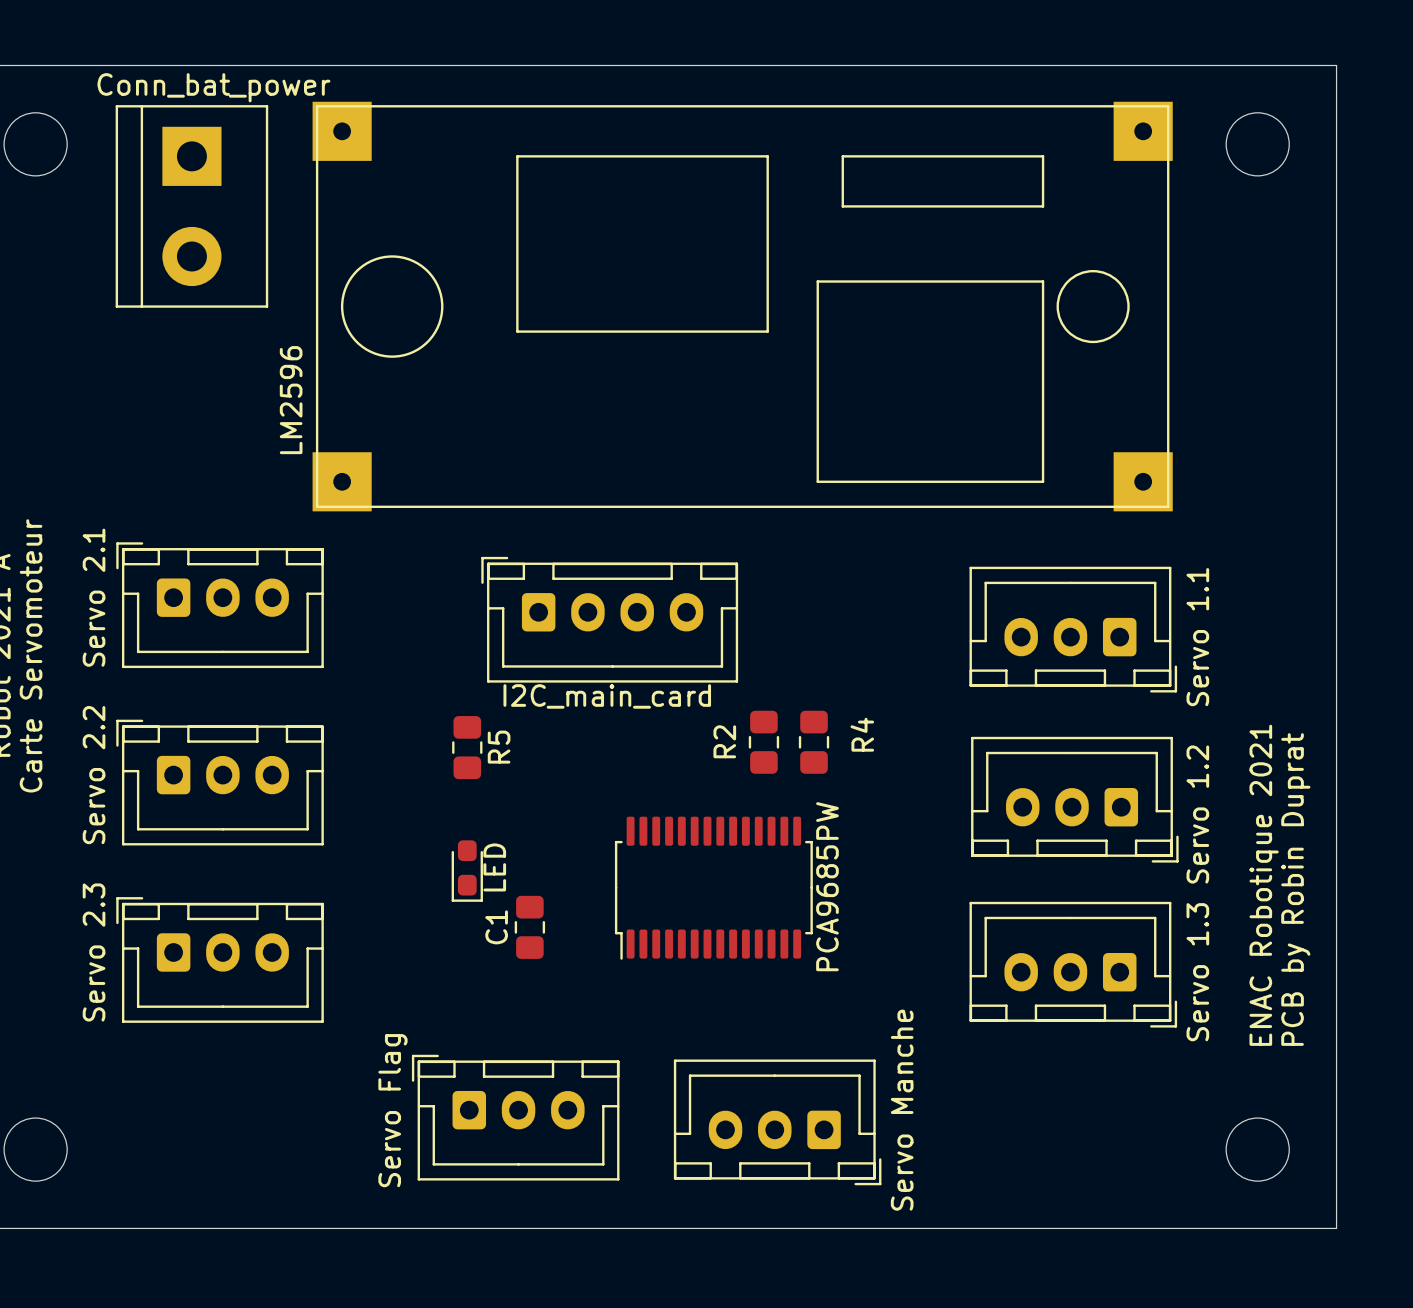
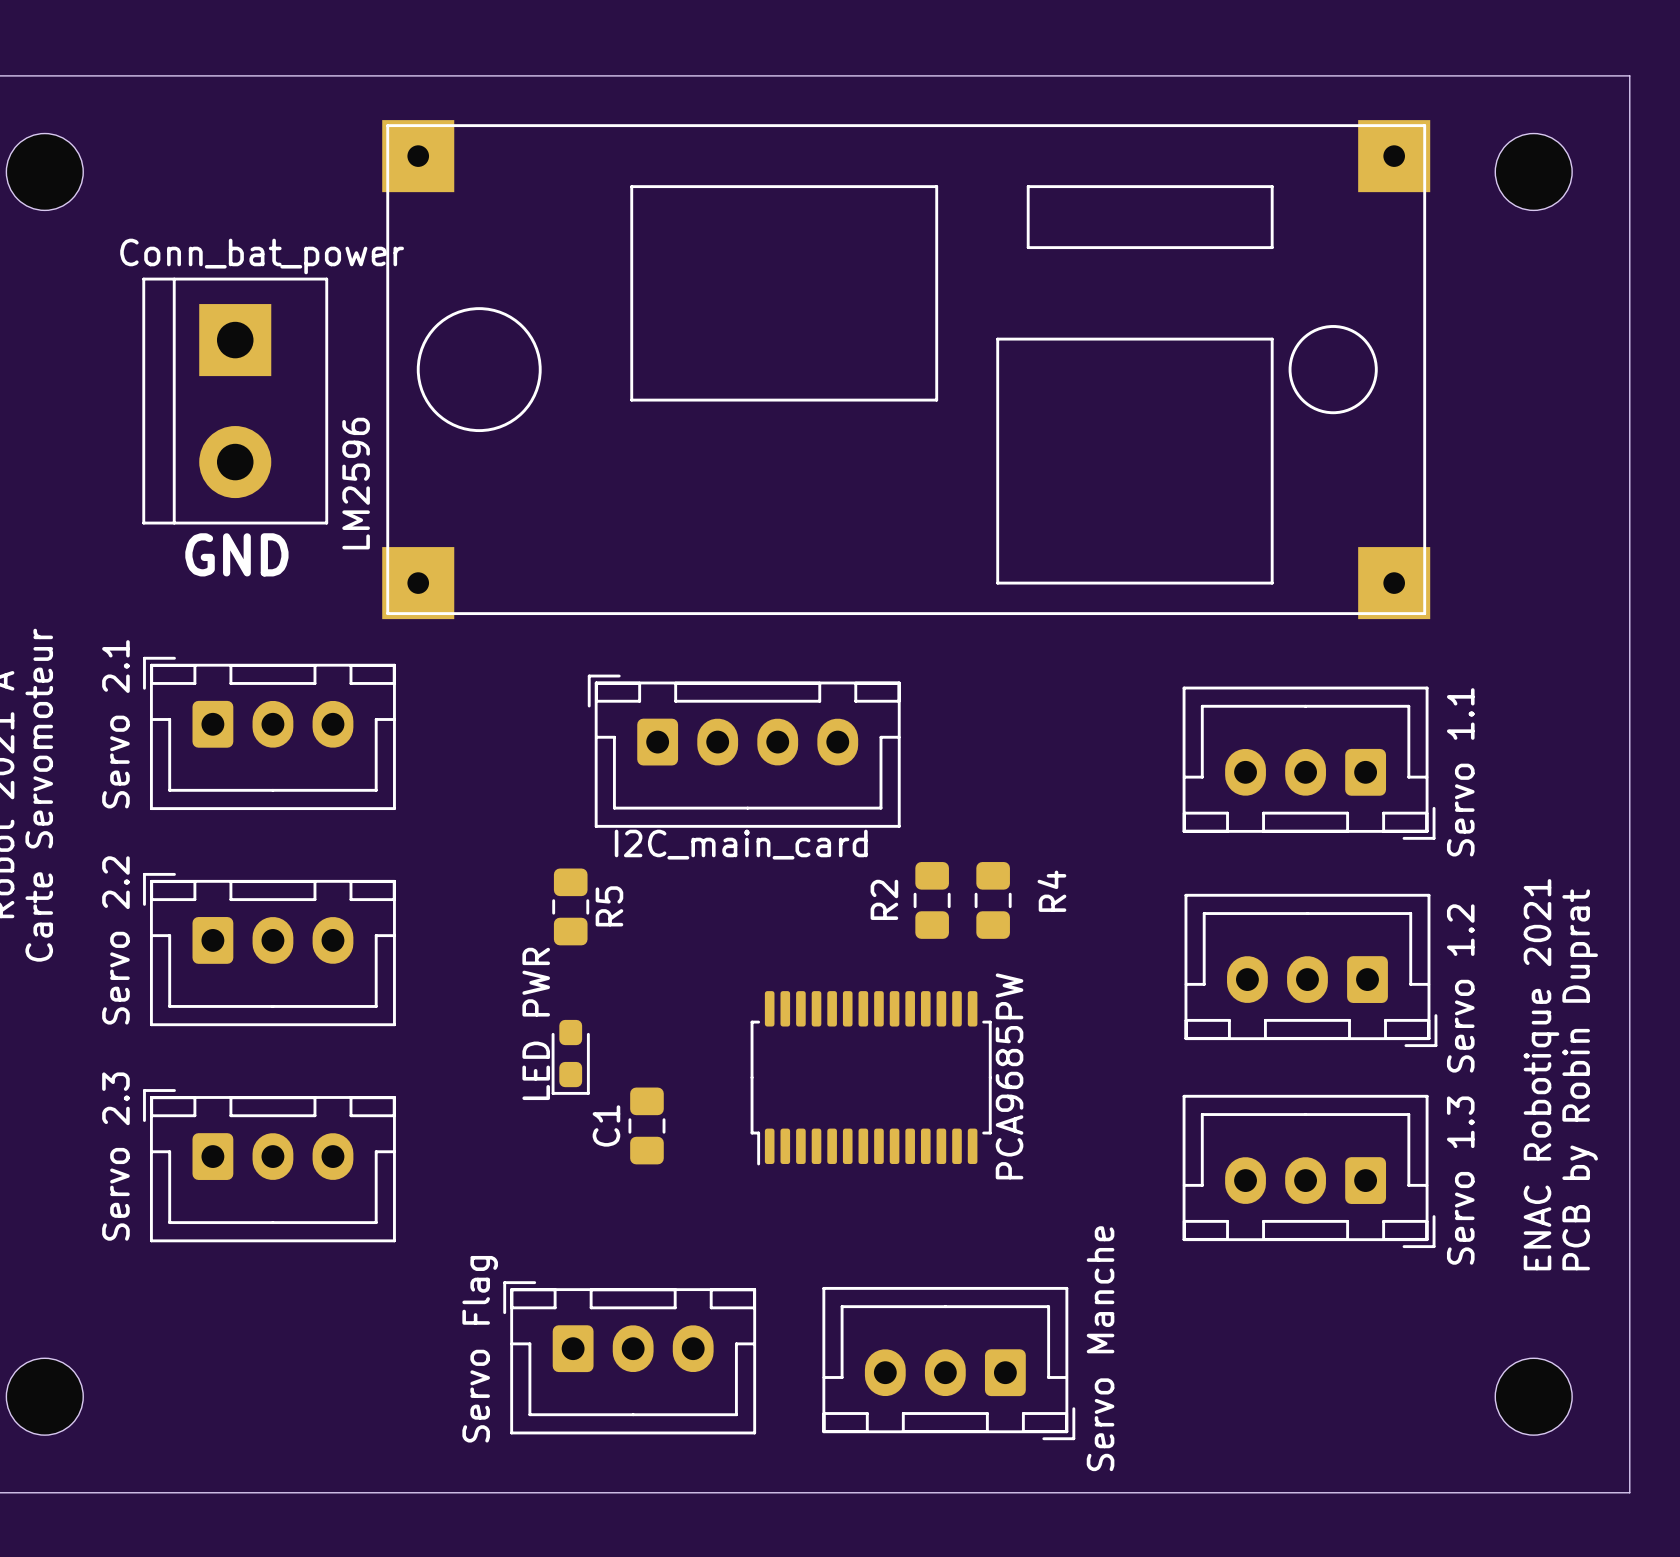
part position: (191, 206) -> (235, 401)
text: none -> GND (236, 554)
part value: LED (494, 867) -> LED PWR (536, 1023)

